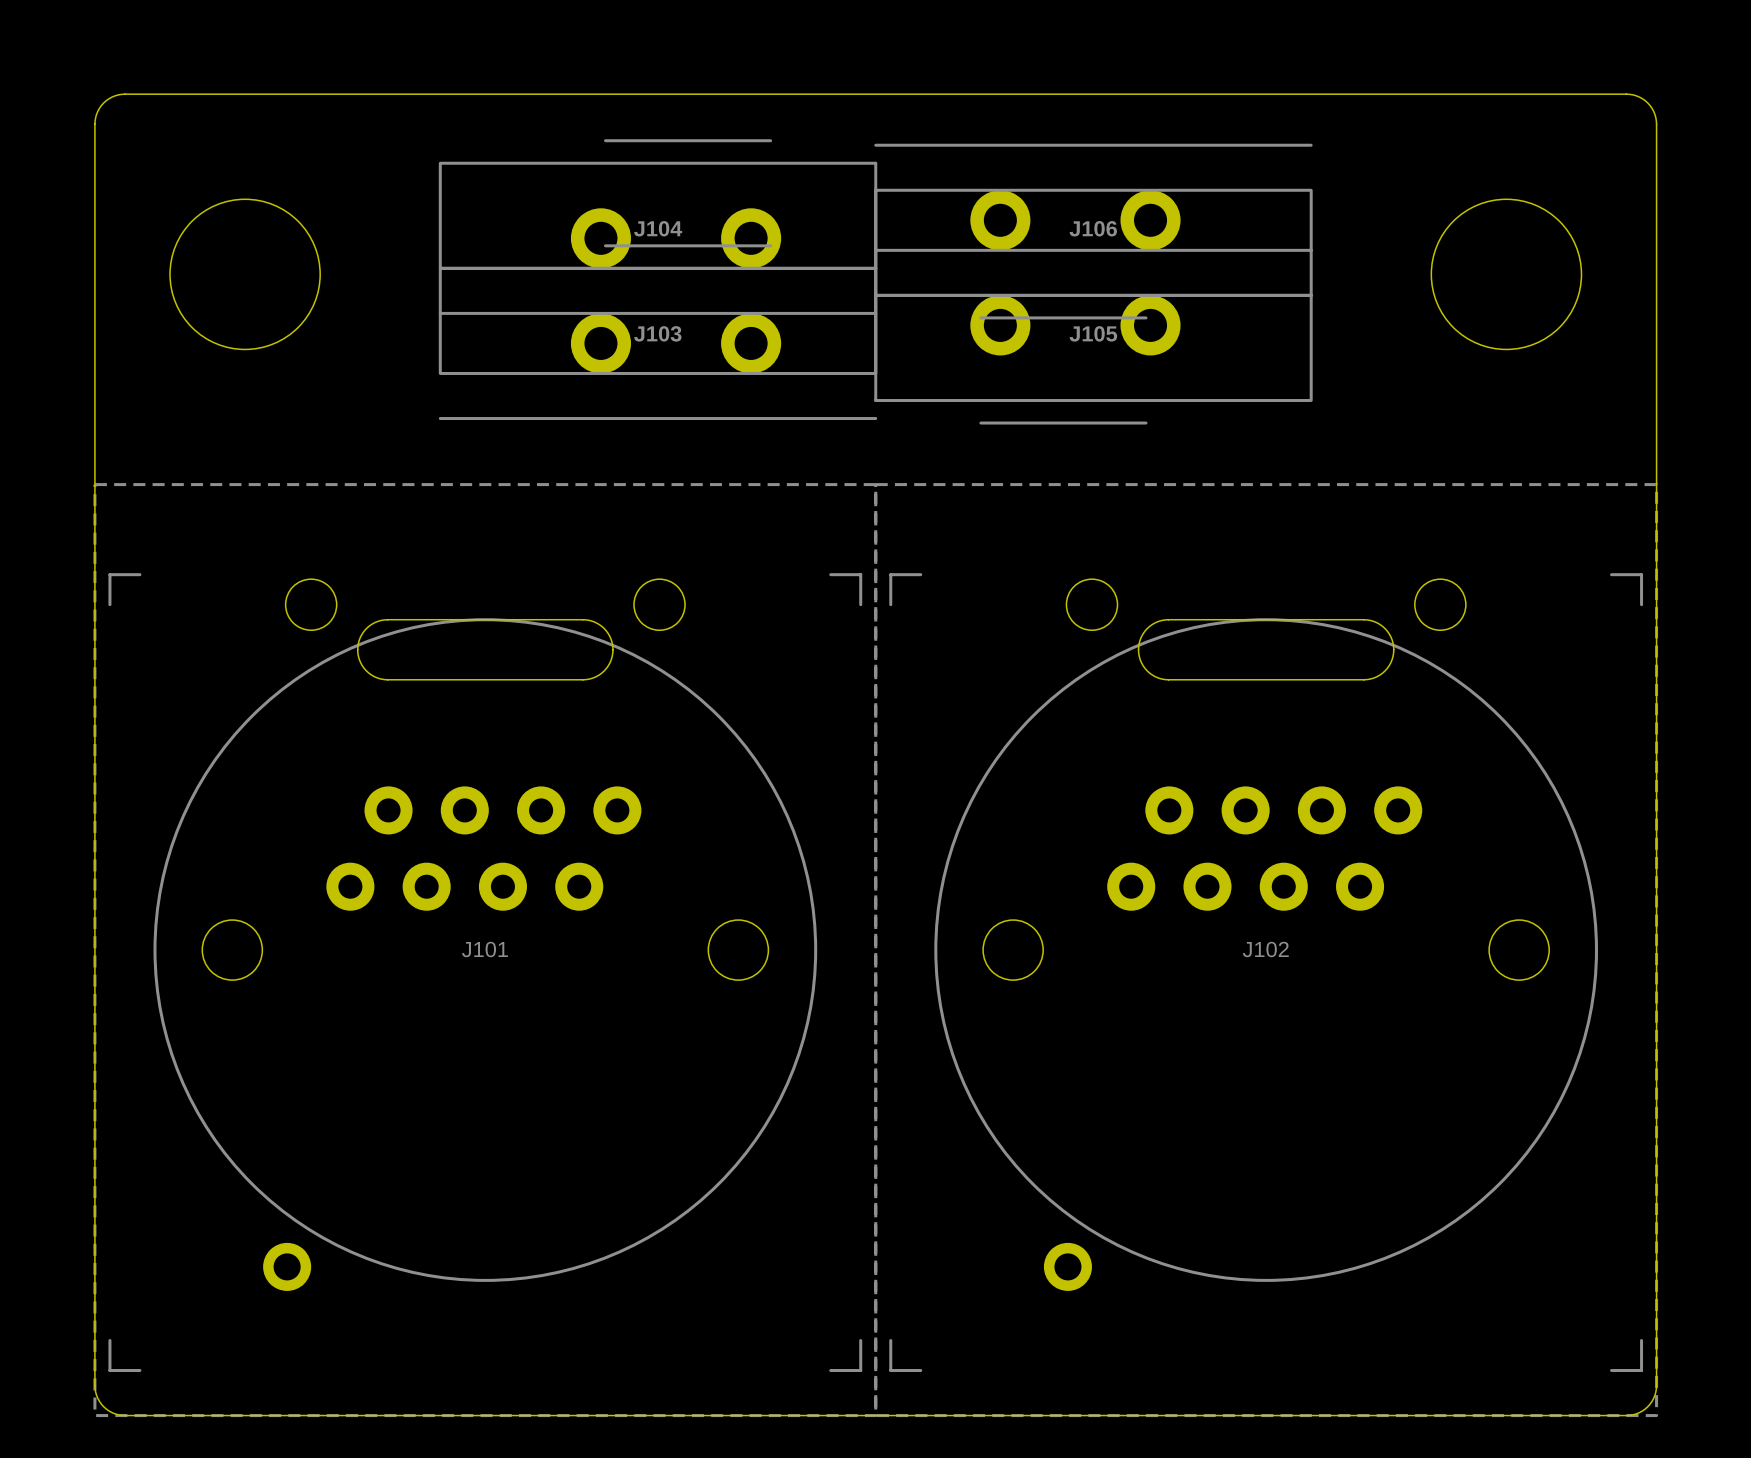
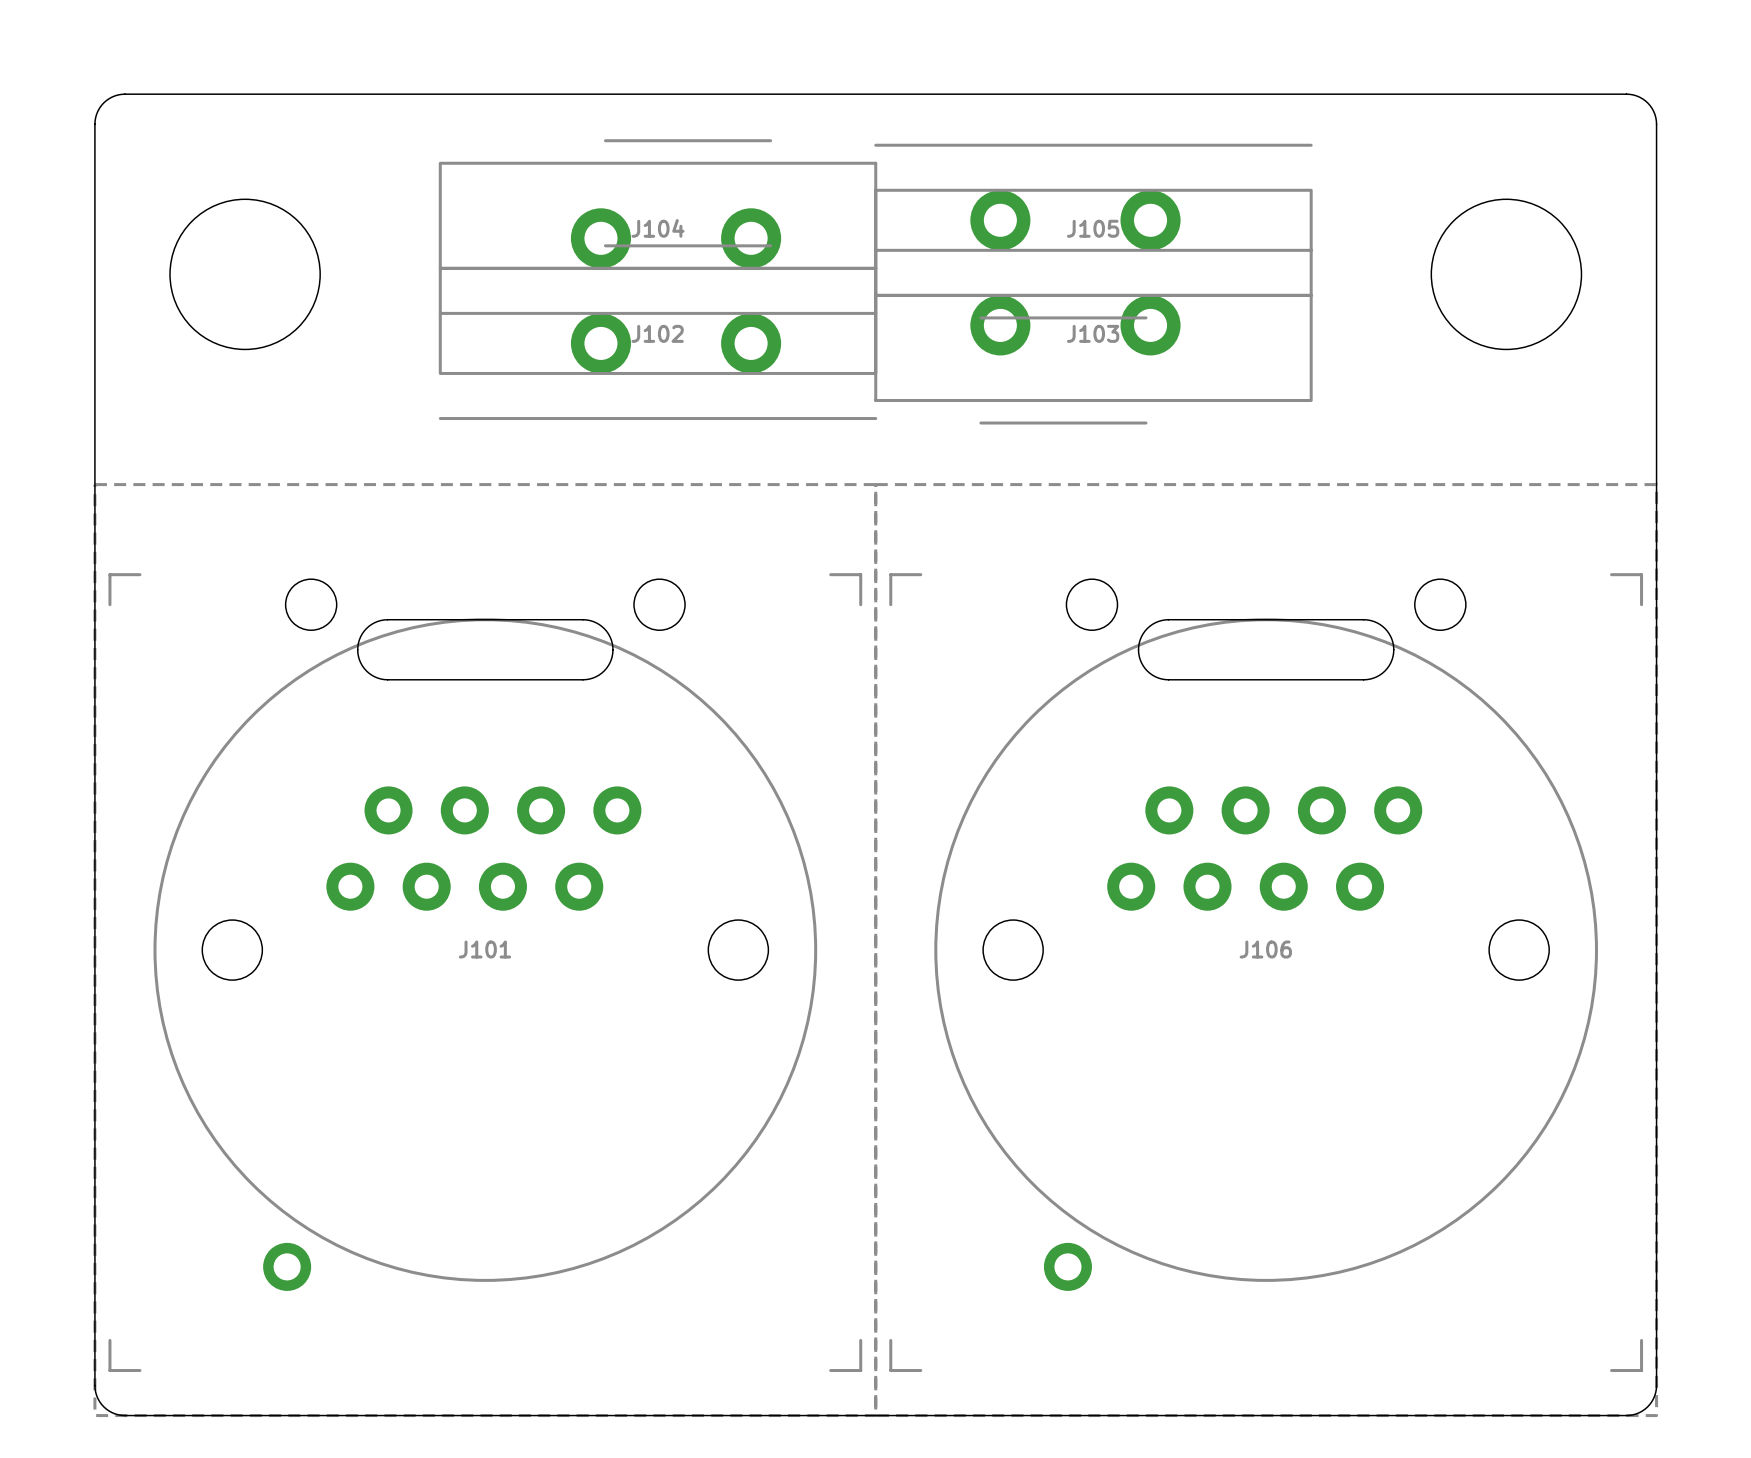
J106 name: J106 (1093, 228) -> J105 (1093, 228)
J103 name: J103 (657, 333) -> J102 (657, 333)
J105 name: J105 (1093, 333) -> J103 (1093, 333)
J102 name: J102 (1265, 949) -> J106 (1265, 949)

